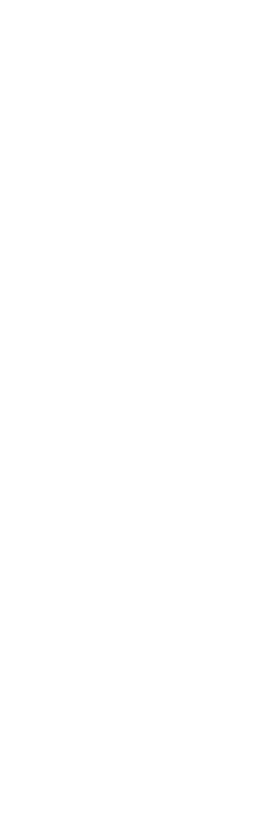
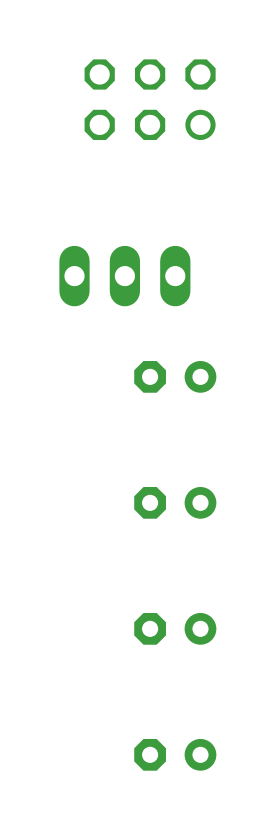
part: none -> (150, 99)
part: none -> (124, 276)
part: none -> (175, 376)
part: none -> (175, 502)
part: none -> (175, 628)
part: none -> (175, 754)

